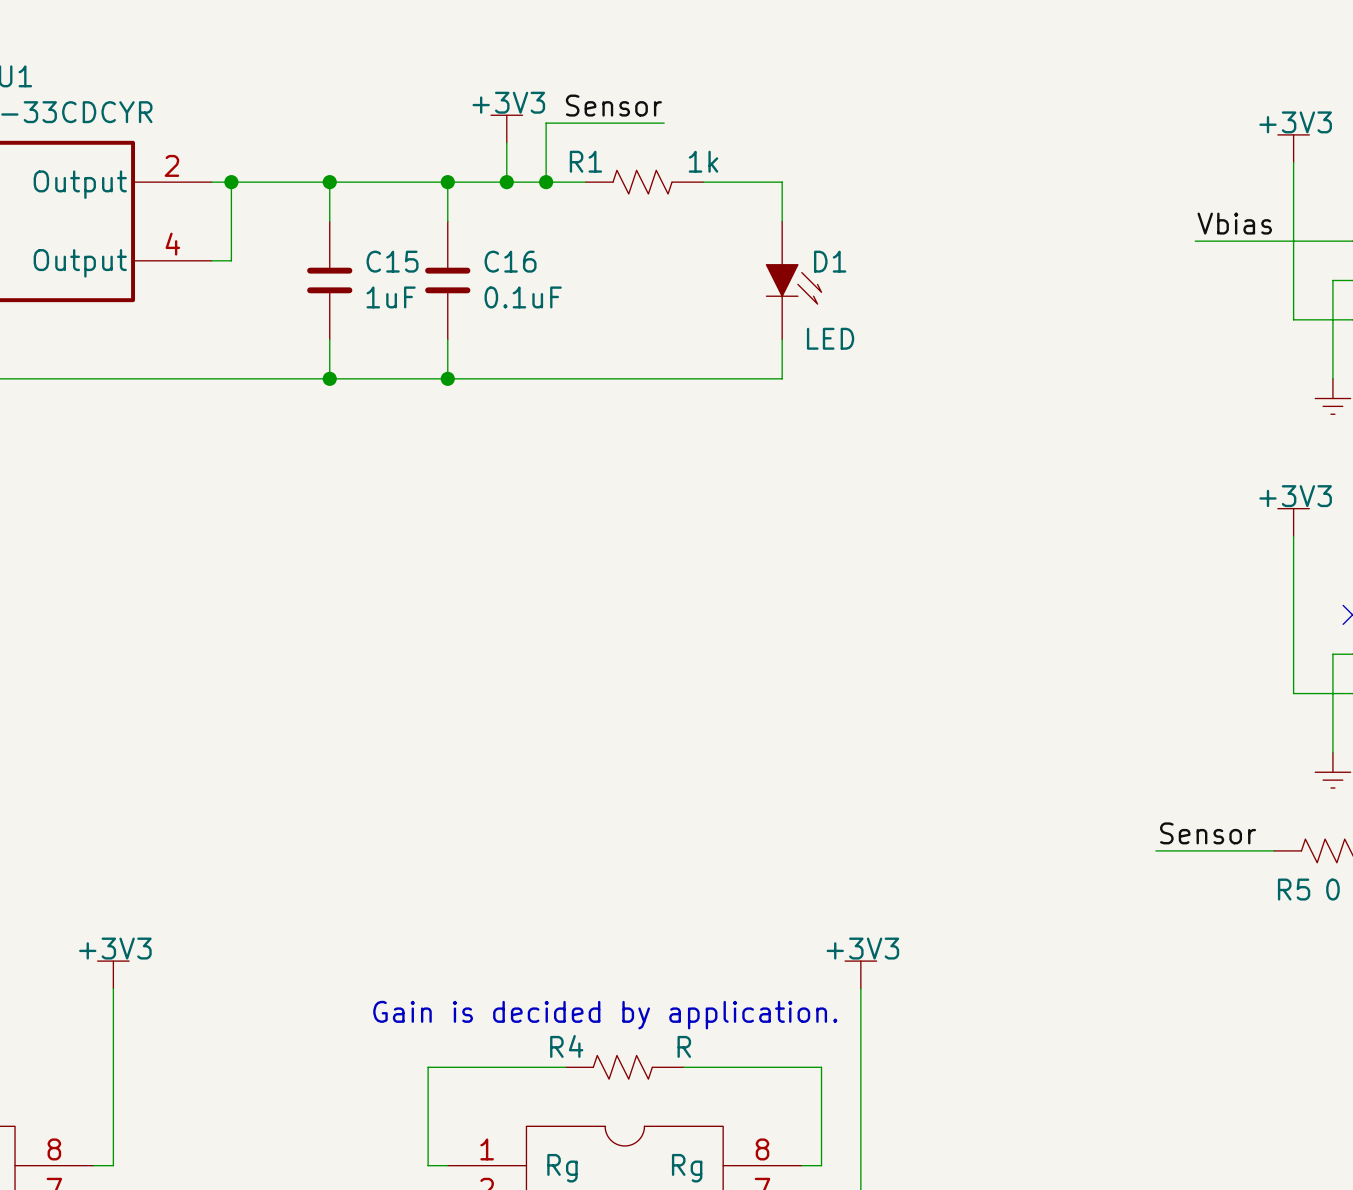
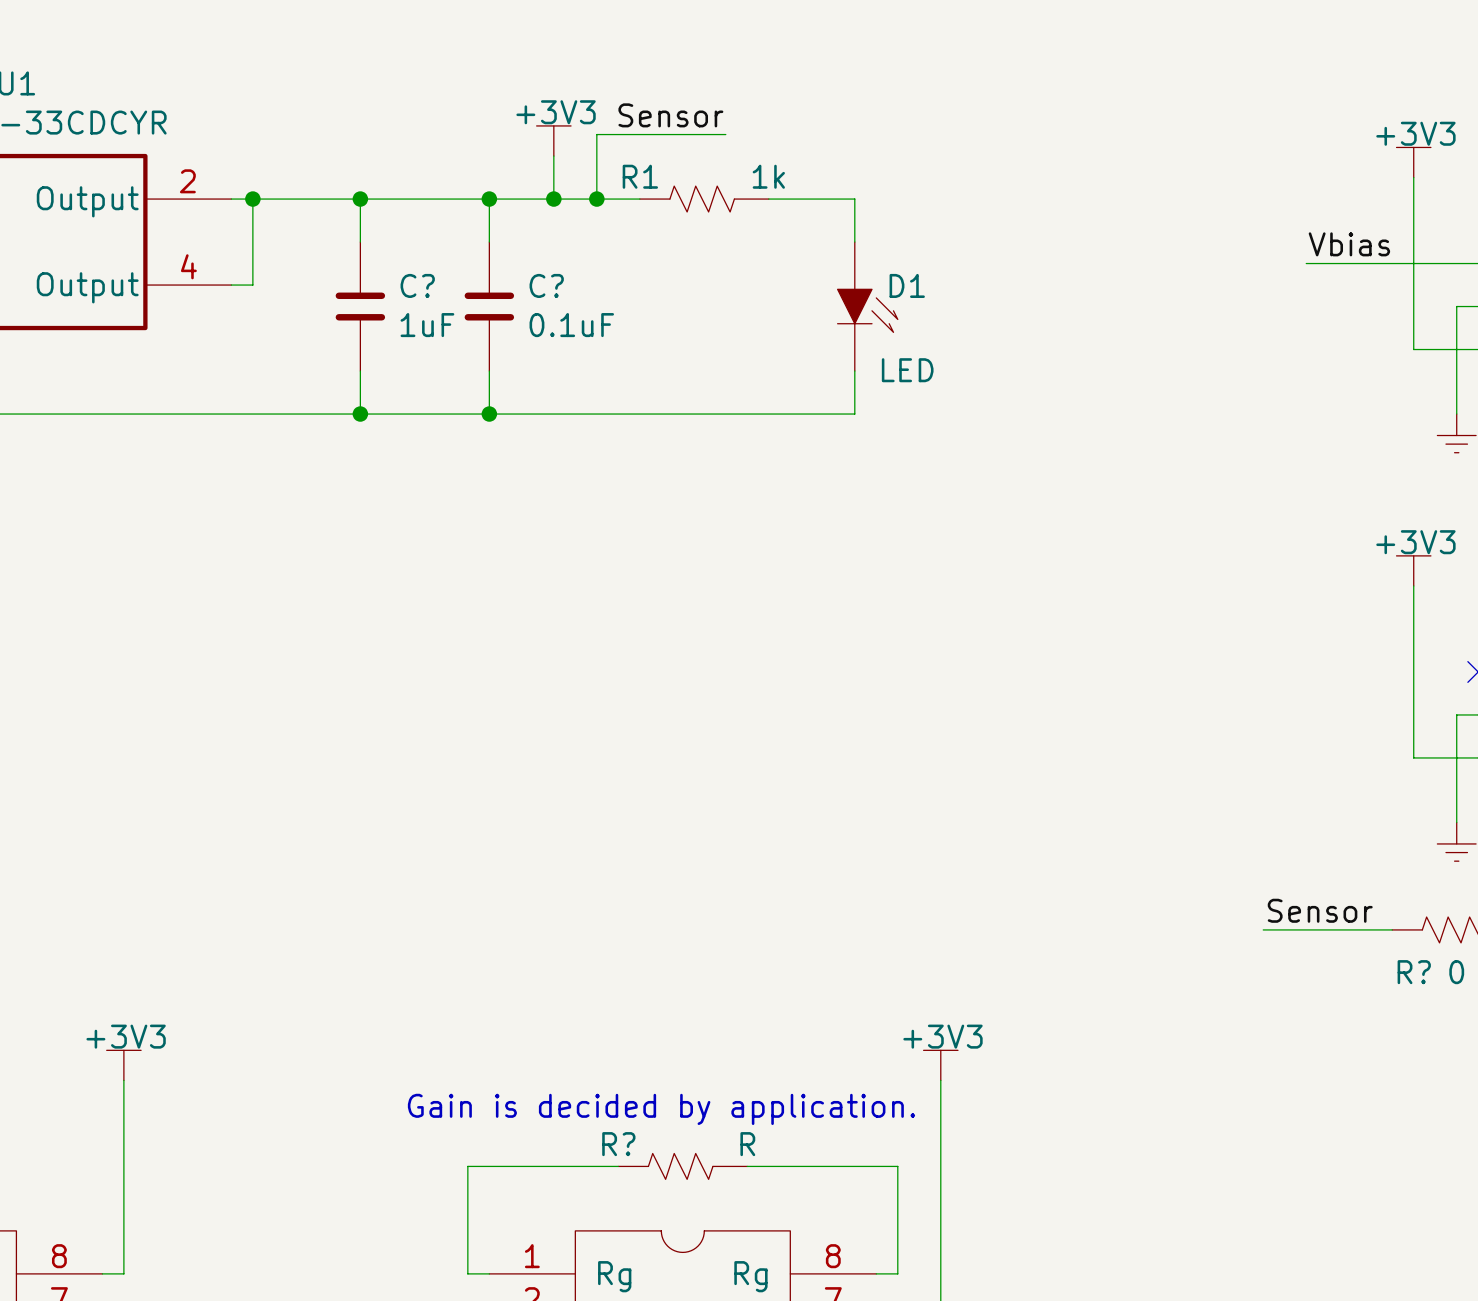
C15 name: C15 (392, 261) -> C? (417, 285)
C16 name: C16 (510, 261) -> C? (546, 285)
R5 name: R5 (1294, 889) -> R? (1414, 972)
R4 name: R4 (566, 1046) -> R? (618, 1144)

